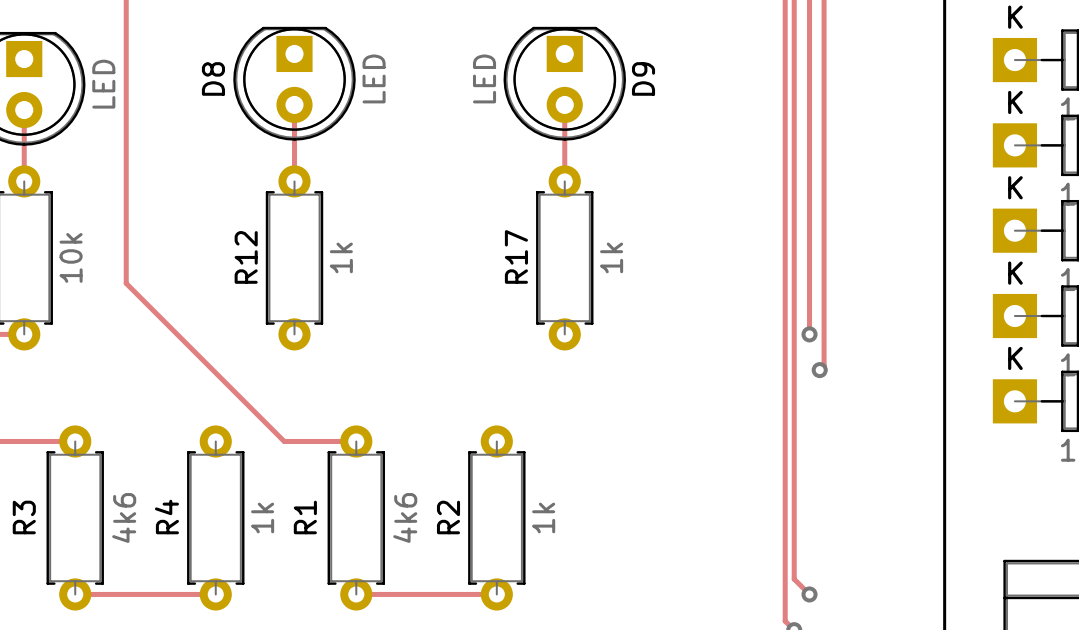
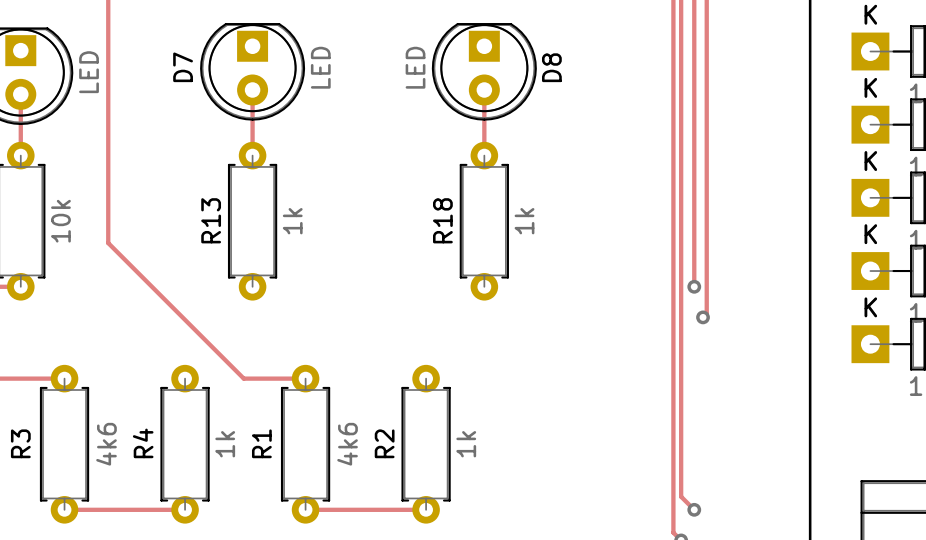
D8 name: D8 (213, 78) -> D7 (183, 67)
D9 name: D9 (643, 78) -> D8 (551, 67)
R17 name: R17 (516, 256) -> R18 (442, 220)
R12 name: R12 (246, 257) -> R13 (211, 220)

